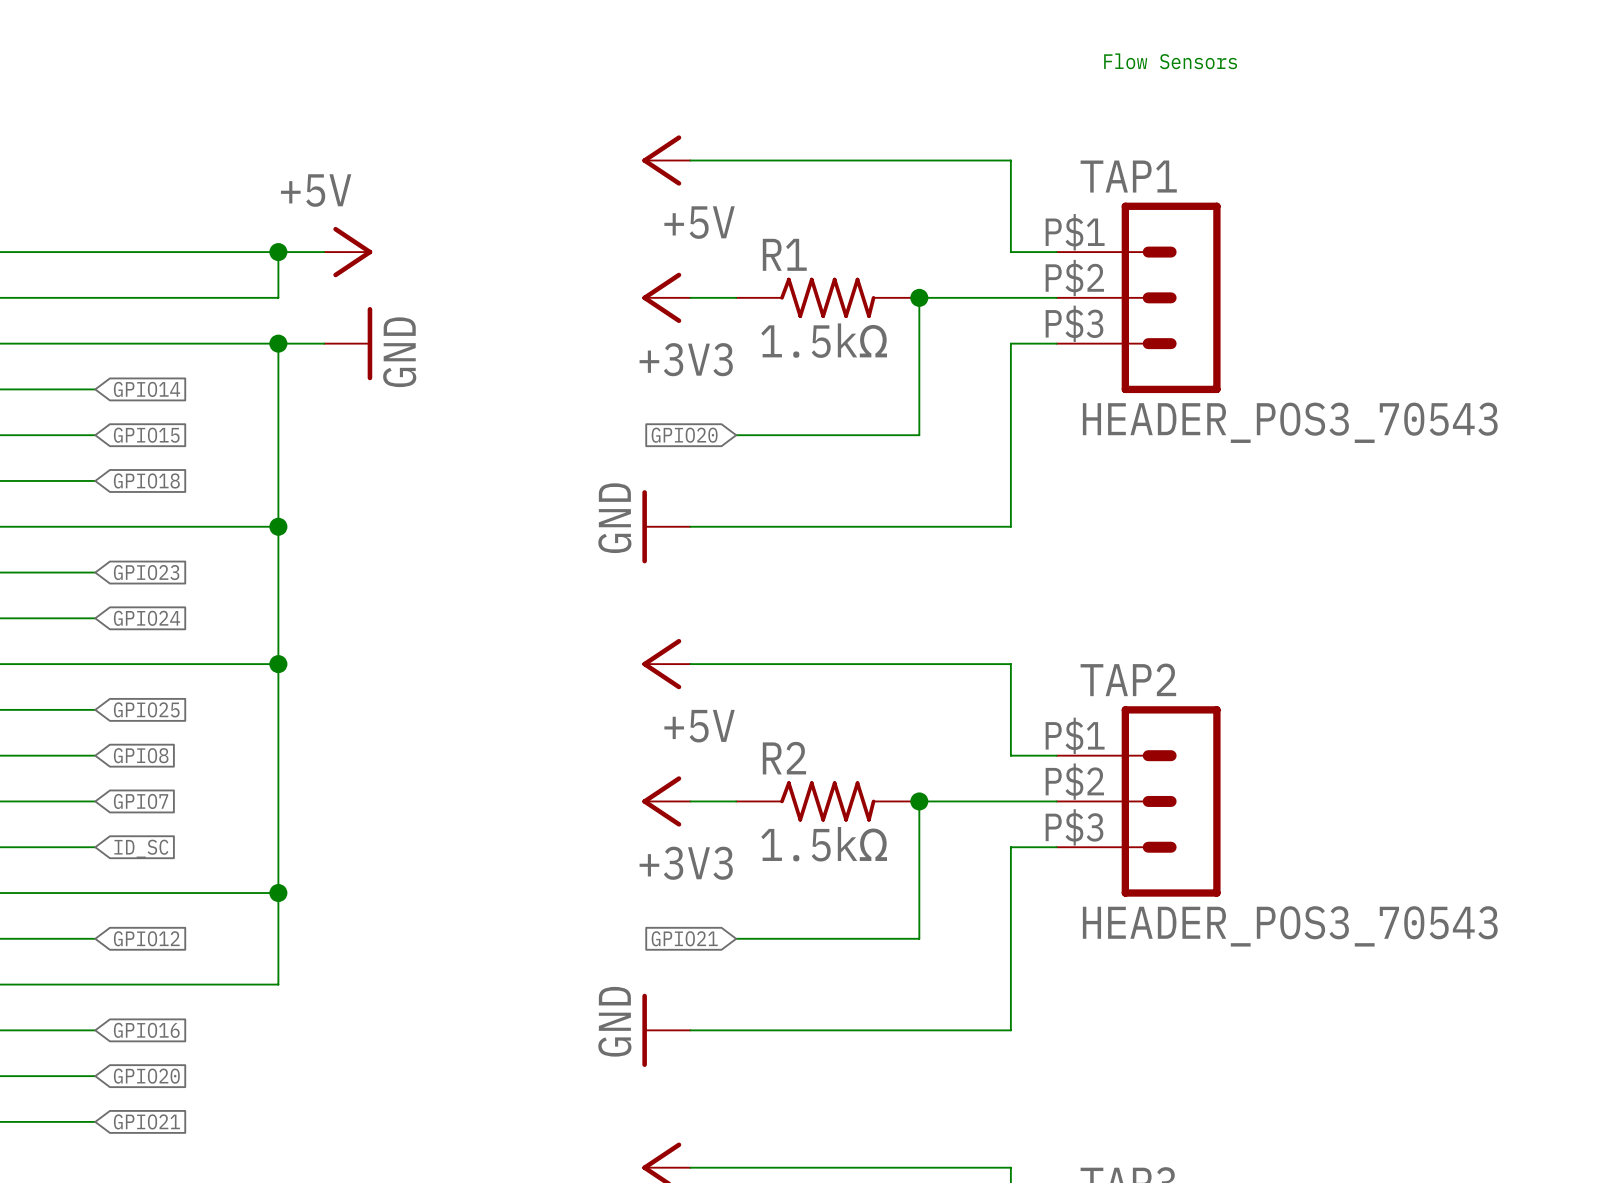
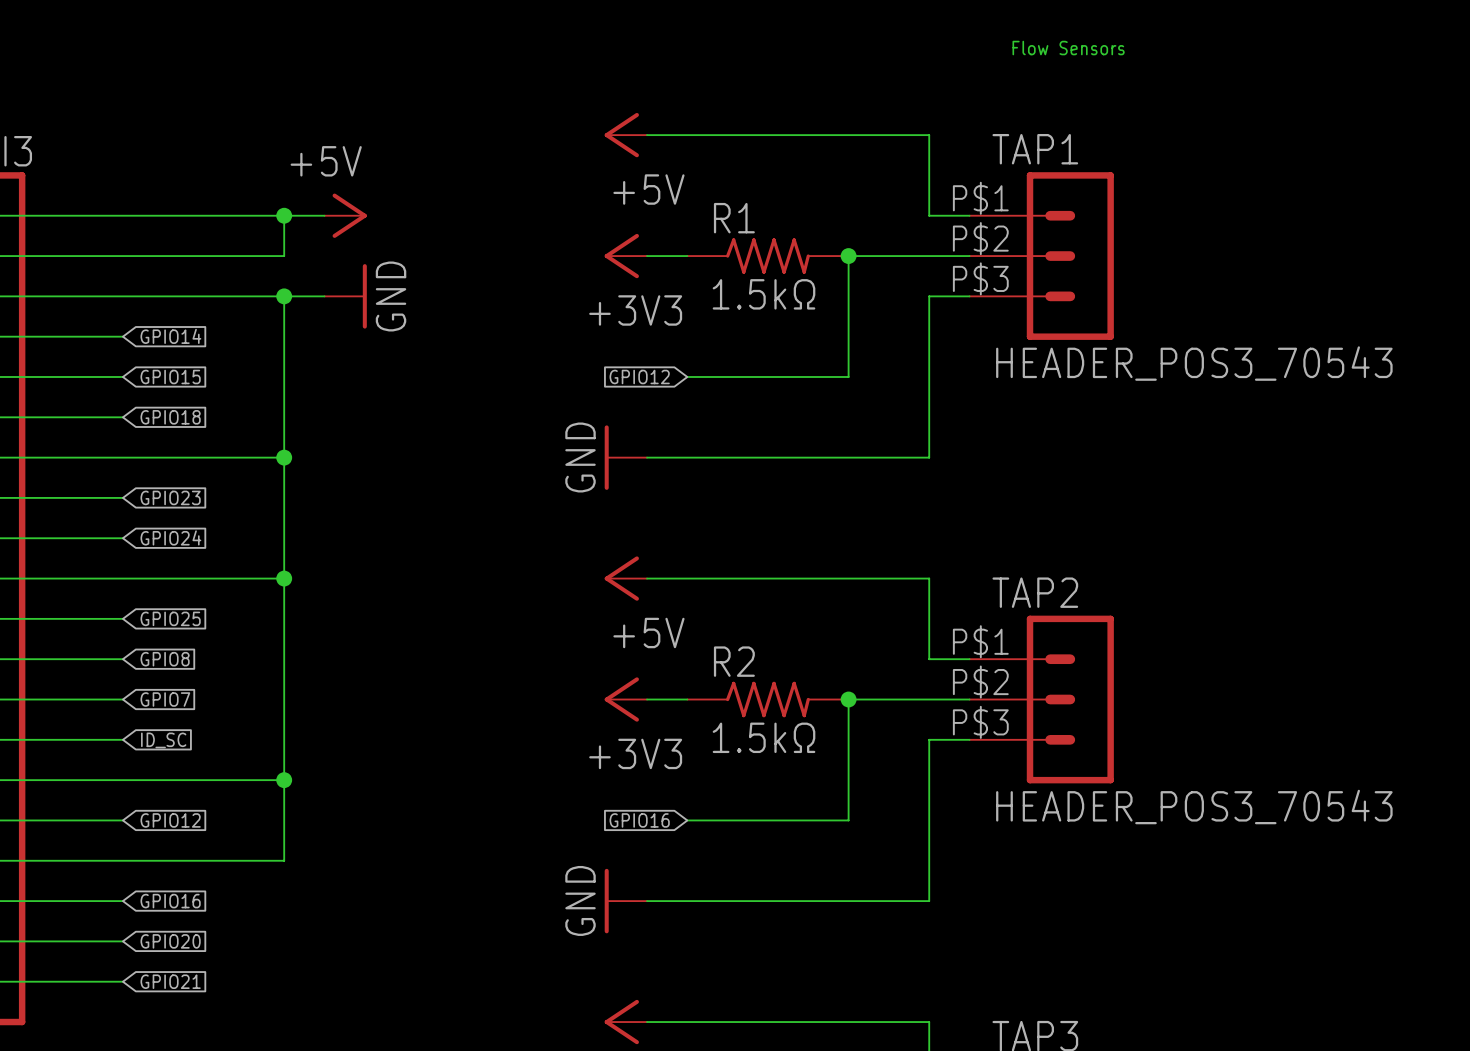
global label: GPIO20 (684, 435) -> GPIO12 (639, 376)
global label: GPIO21 (684, 938) -> GPIO16 (639, 820)

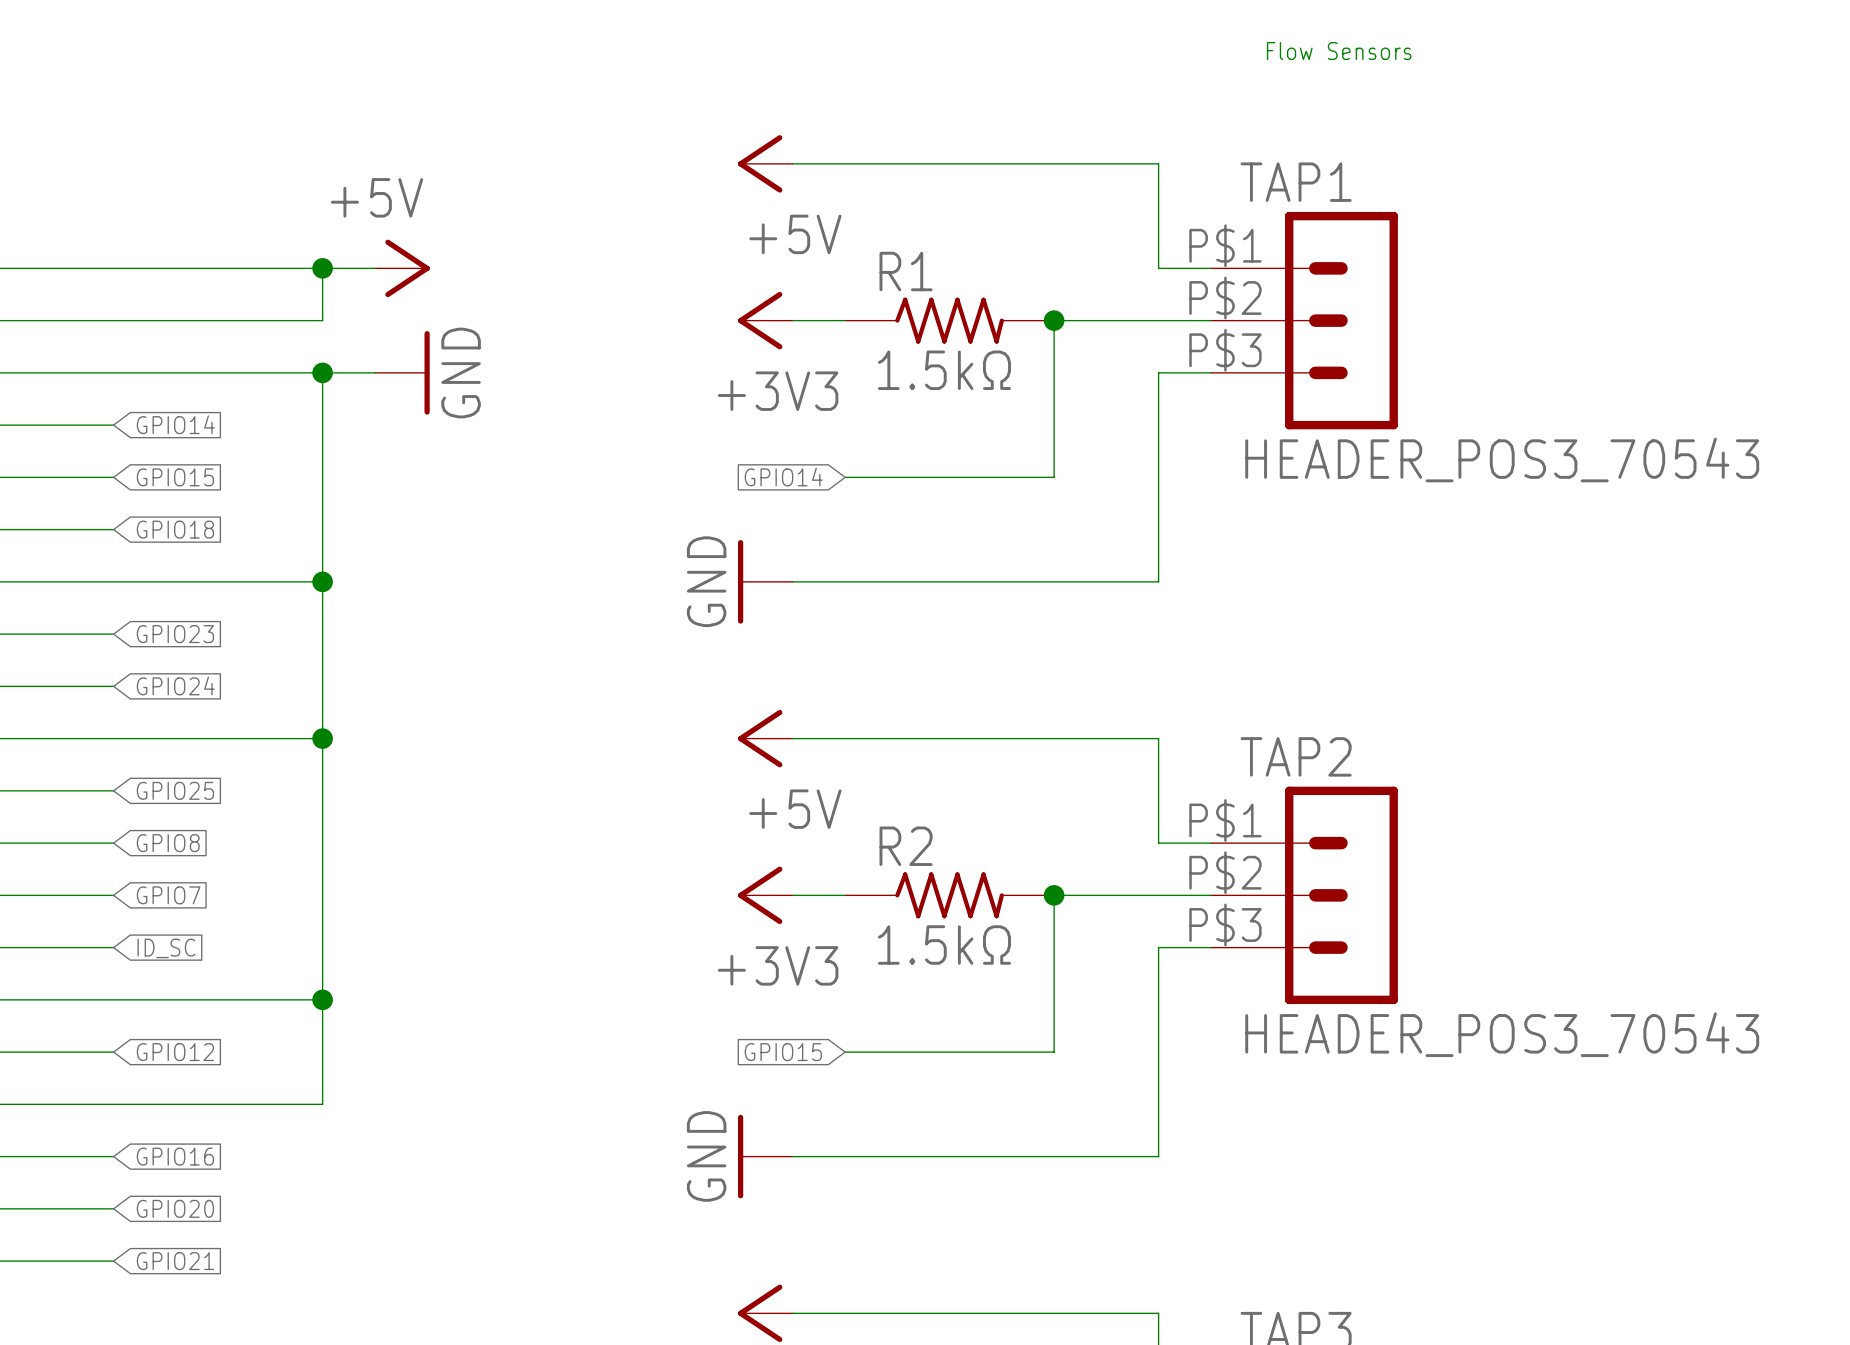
global label: GPIO12 (639, 376) -> GPIO14 (783, 476)
global label: GPIO16 (639, 820) -> GPIO15 (783, 1052)

